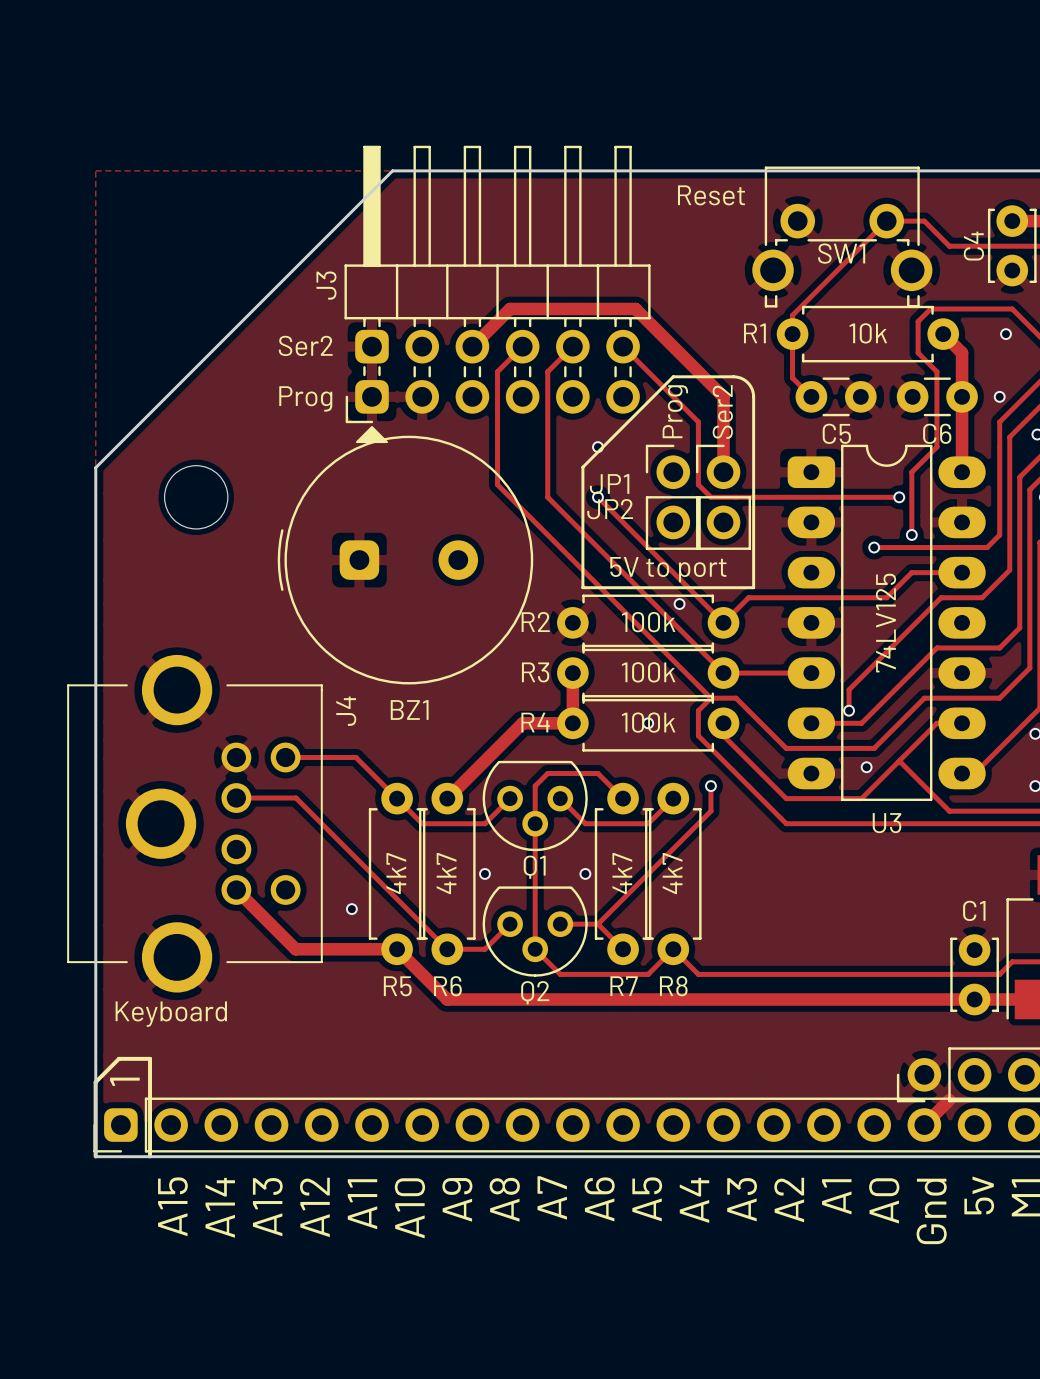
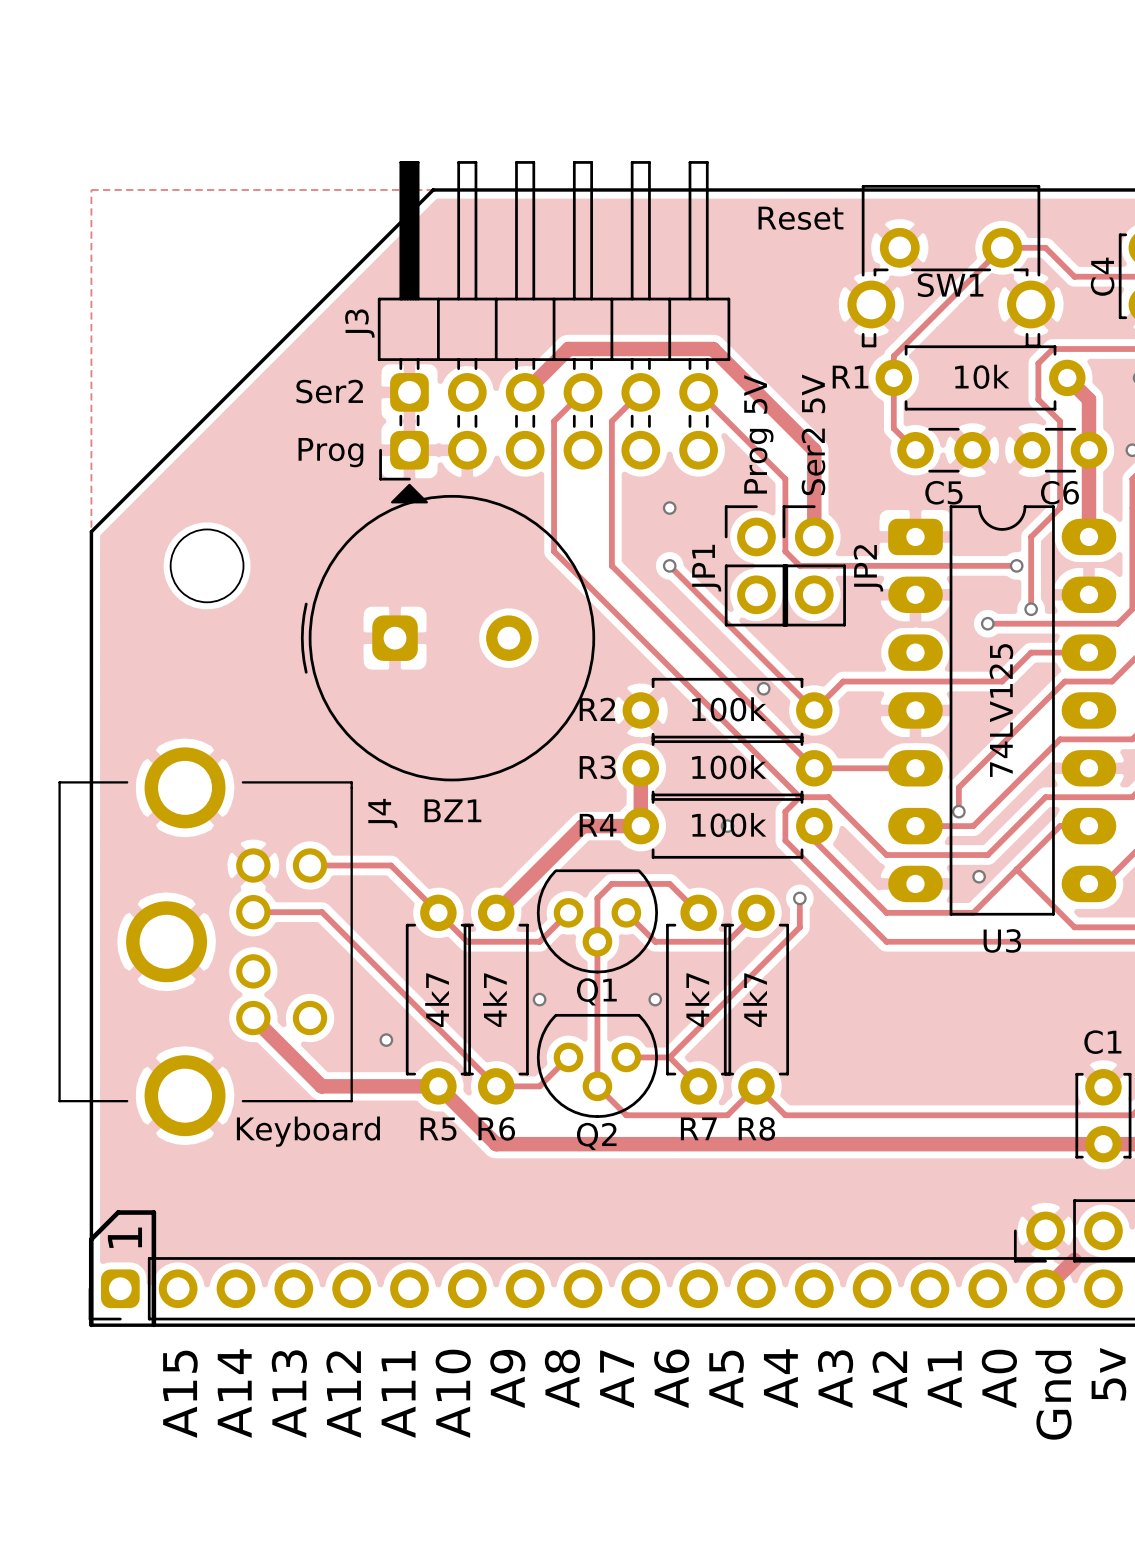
line: (673, 376) (736, 376) (745, 380) (752, 389) (753, 587) (582, 587) (582, 467) (673, 376) -> none
JP1 value: Prog (675, 411) -> Prog 5V (758, 434)
JP2 value: Ser2 (722, 412) -> Ser2 5V (813, 434)
JP1 name rotation: 0° (609, 484) -> 90° counterclockwise (706, 568)
JP2 name rotation: 0° (610, 509) -> 90° counterclockwise (868, 568)
JP2 name position: JP2 (610, 509) -> JP2 (868, 568)
text: 5V to port (668, 569) -> none
J4 value position: Keyboard (171, 1014) -> Keyboard (308, 1131)

